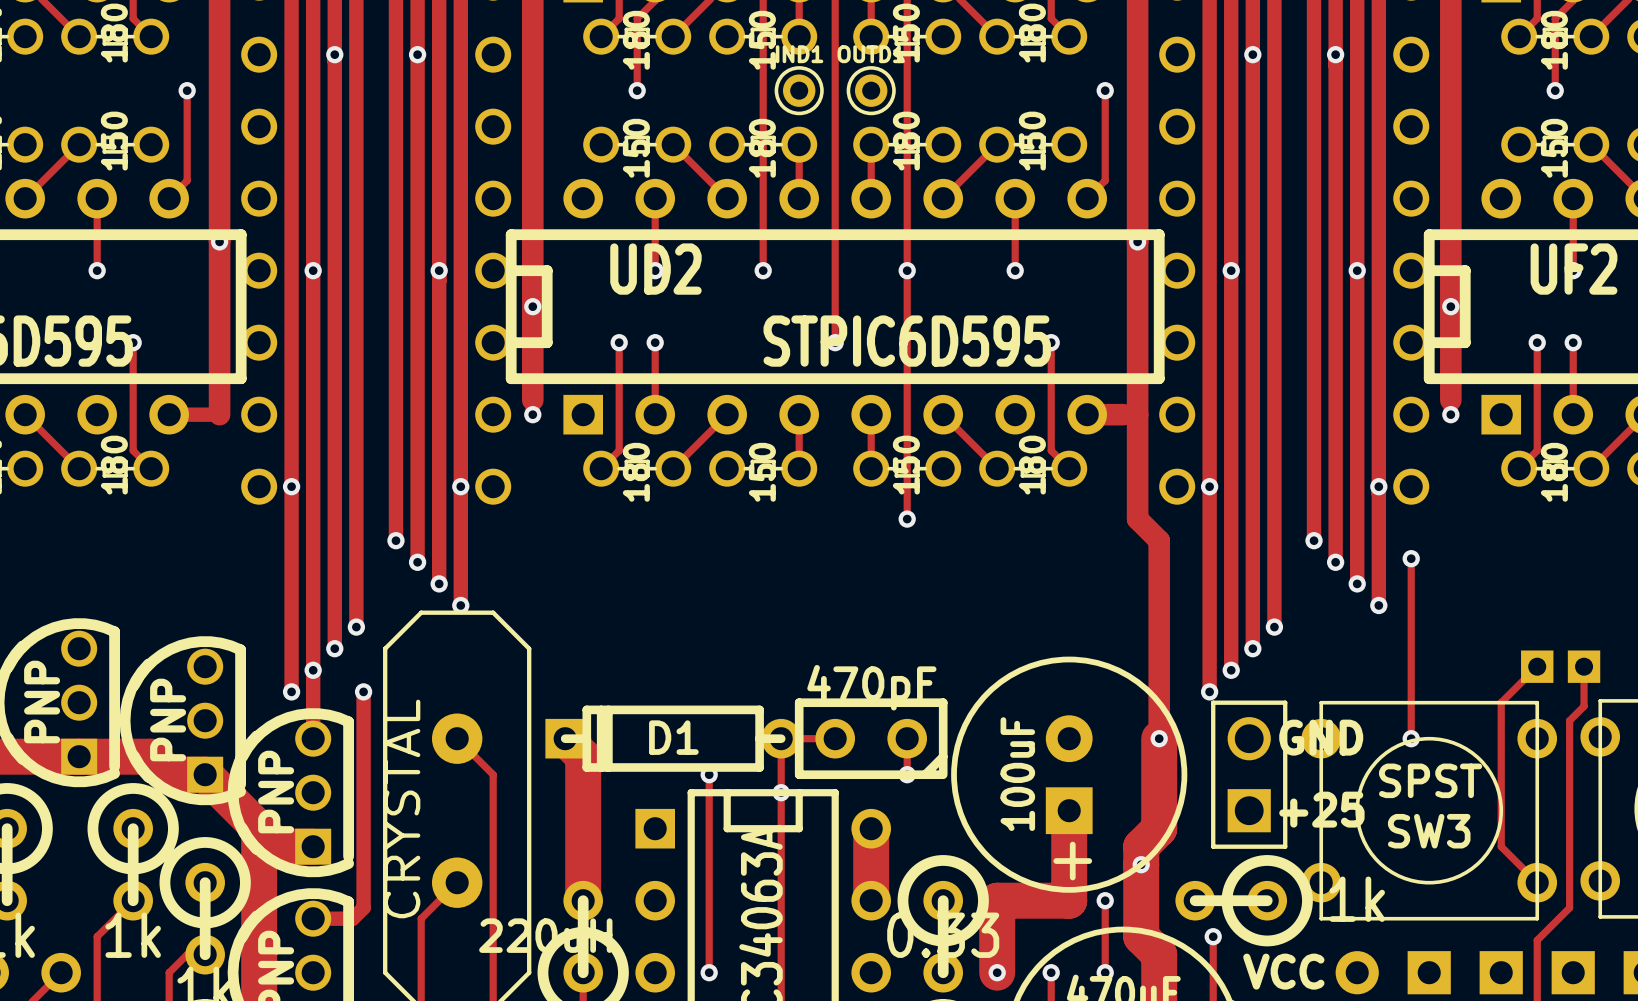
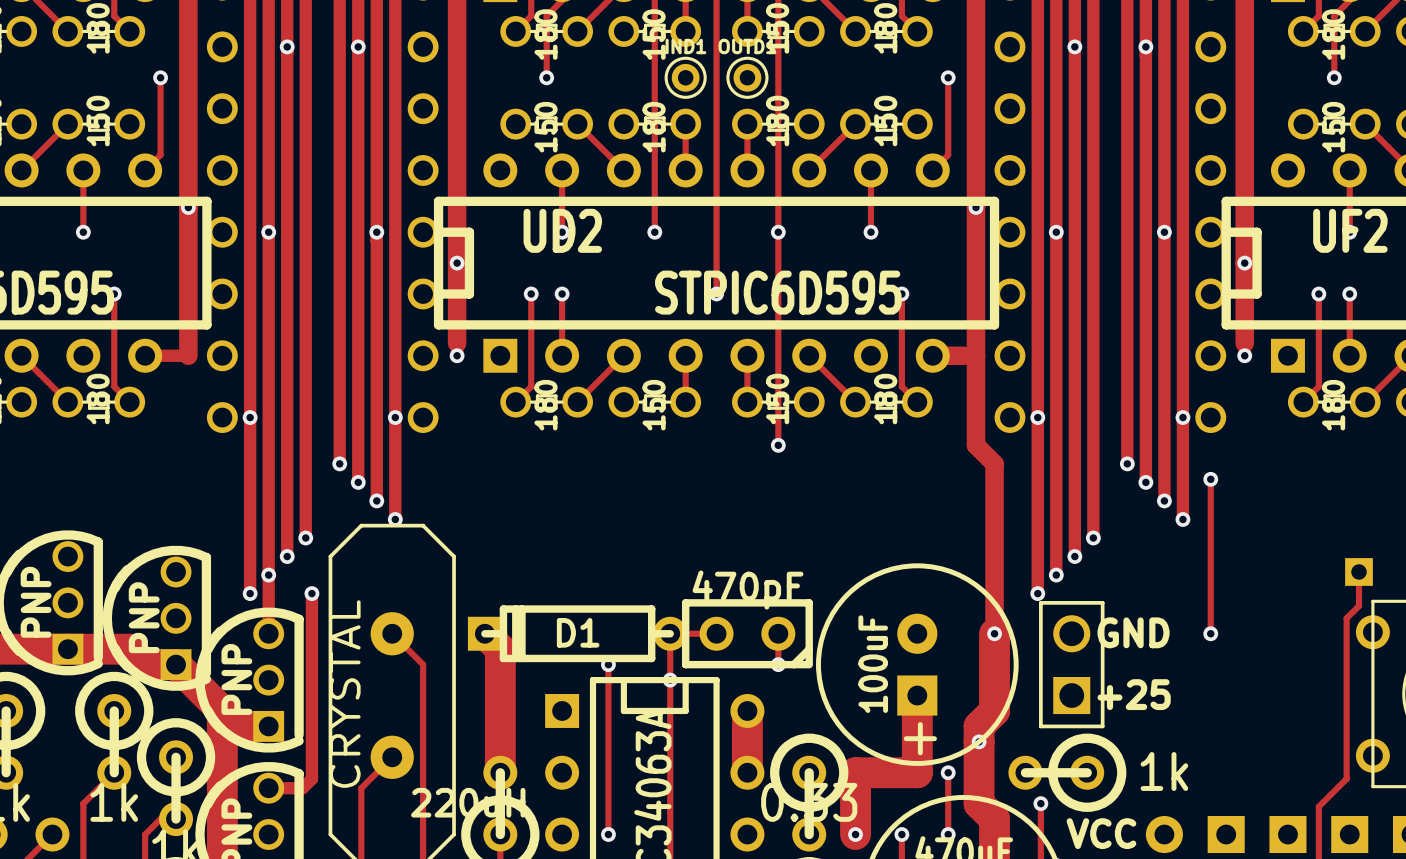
track: (1537, 666) (1501, 702) (1501, 846) (1537, 882) -> none
part: (1537, 666) -> none
SW3: SPST (1429, 810) -> none

